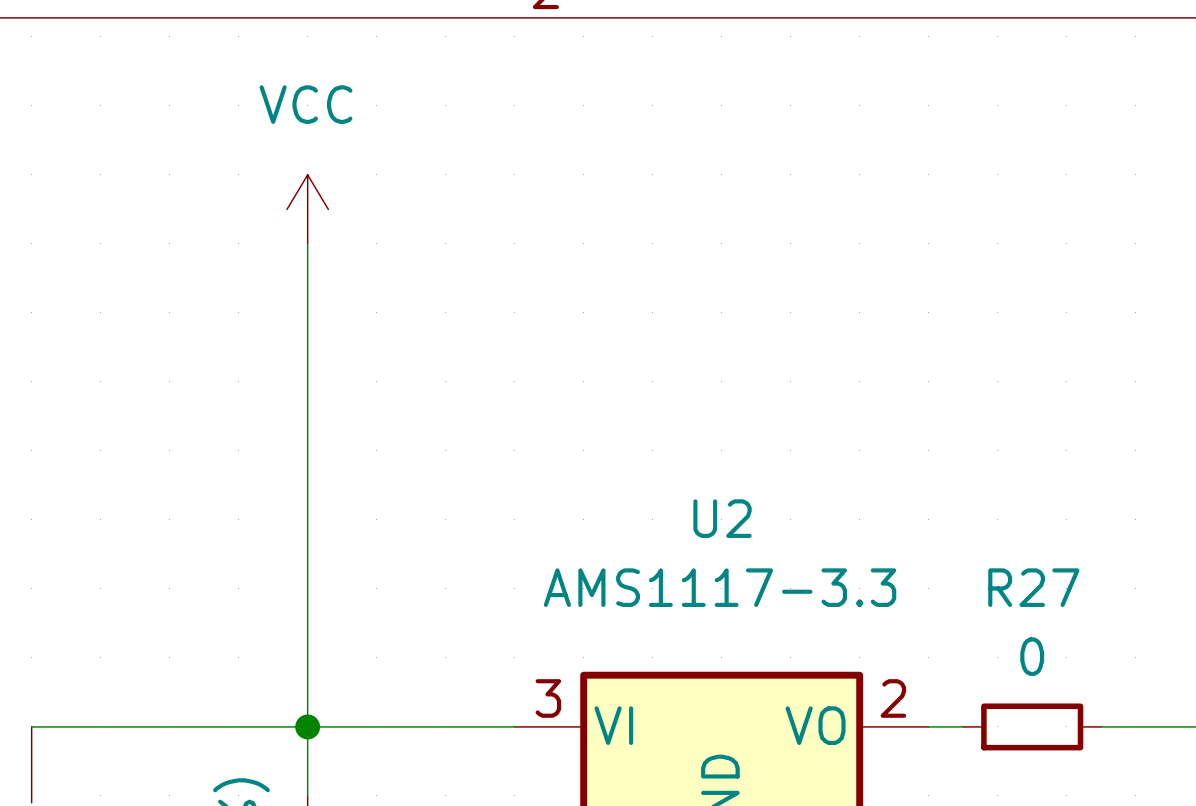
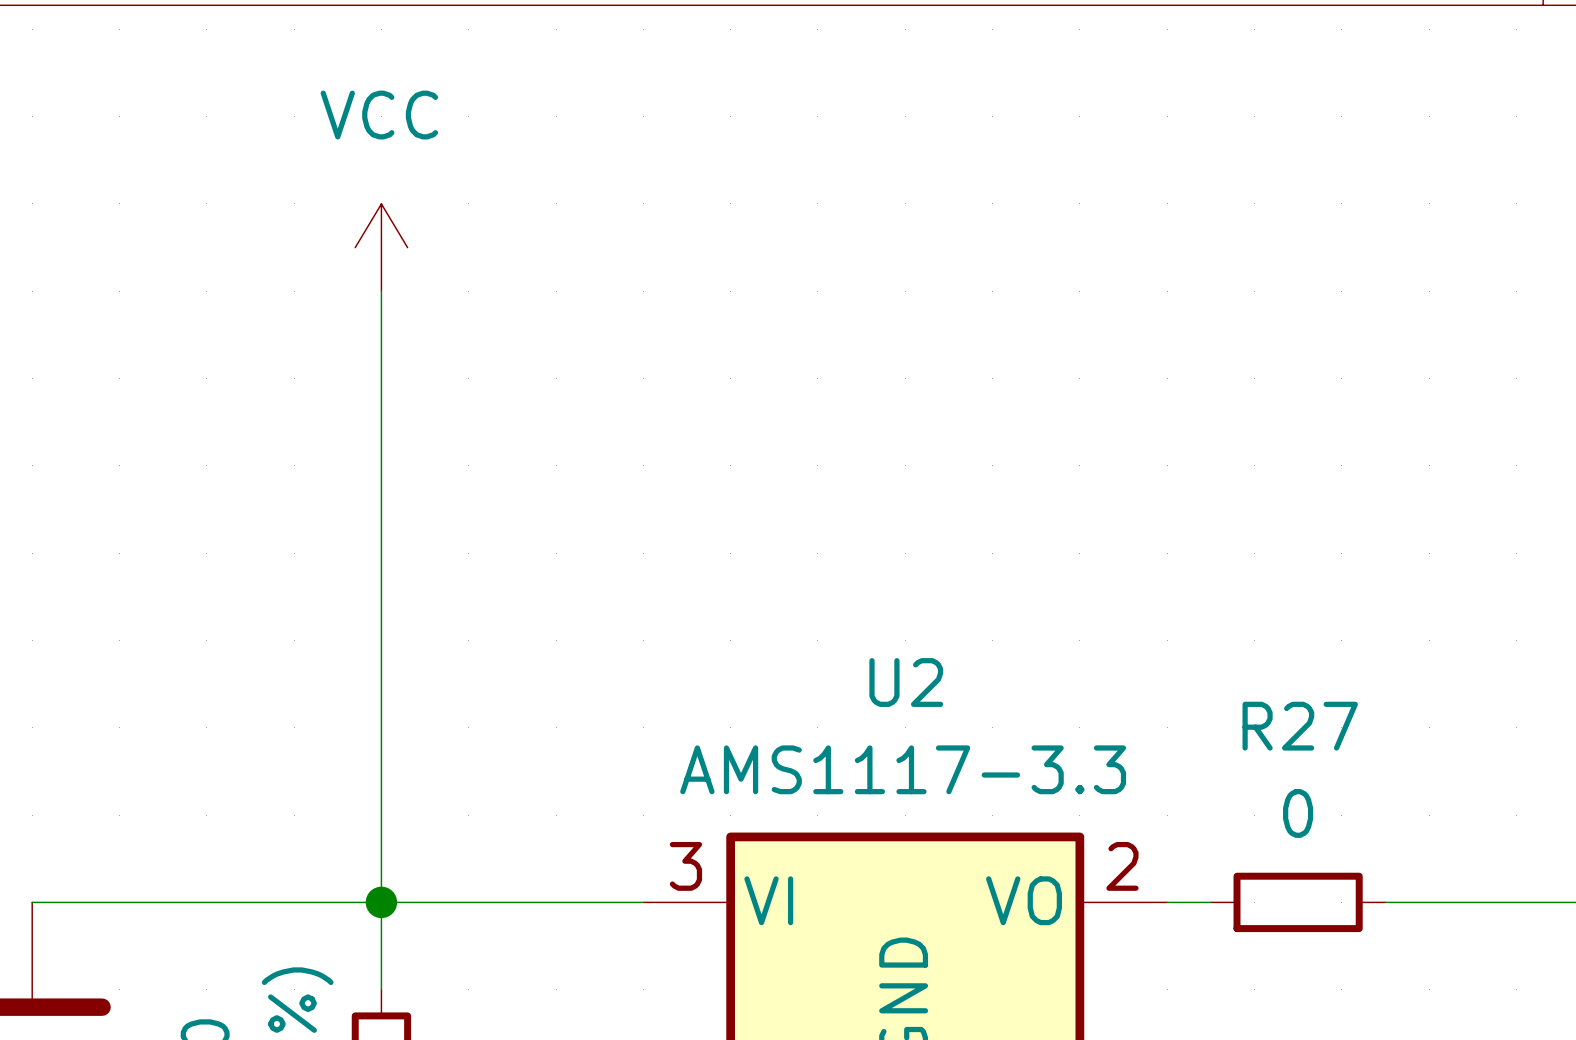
U2 name position: U2 (722, 518) -> U2 (906, 682)
U2 value position: AMS1117-3.3 (720, 587) -> AMS1117-3.3 (903, 769)

